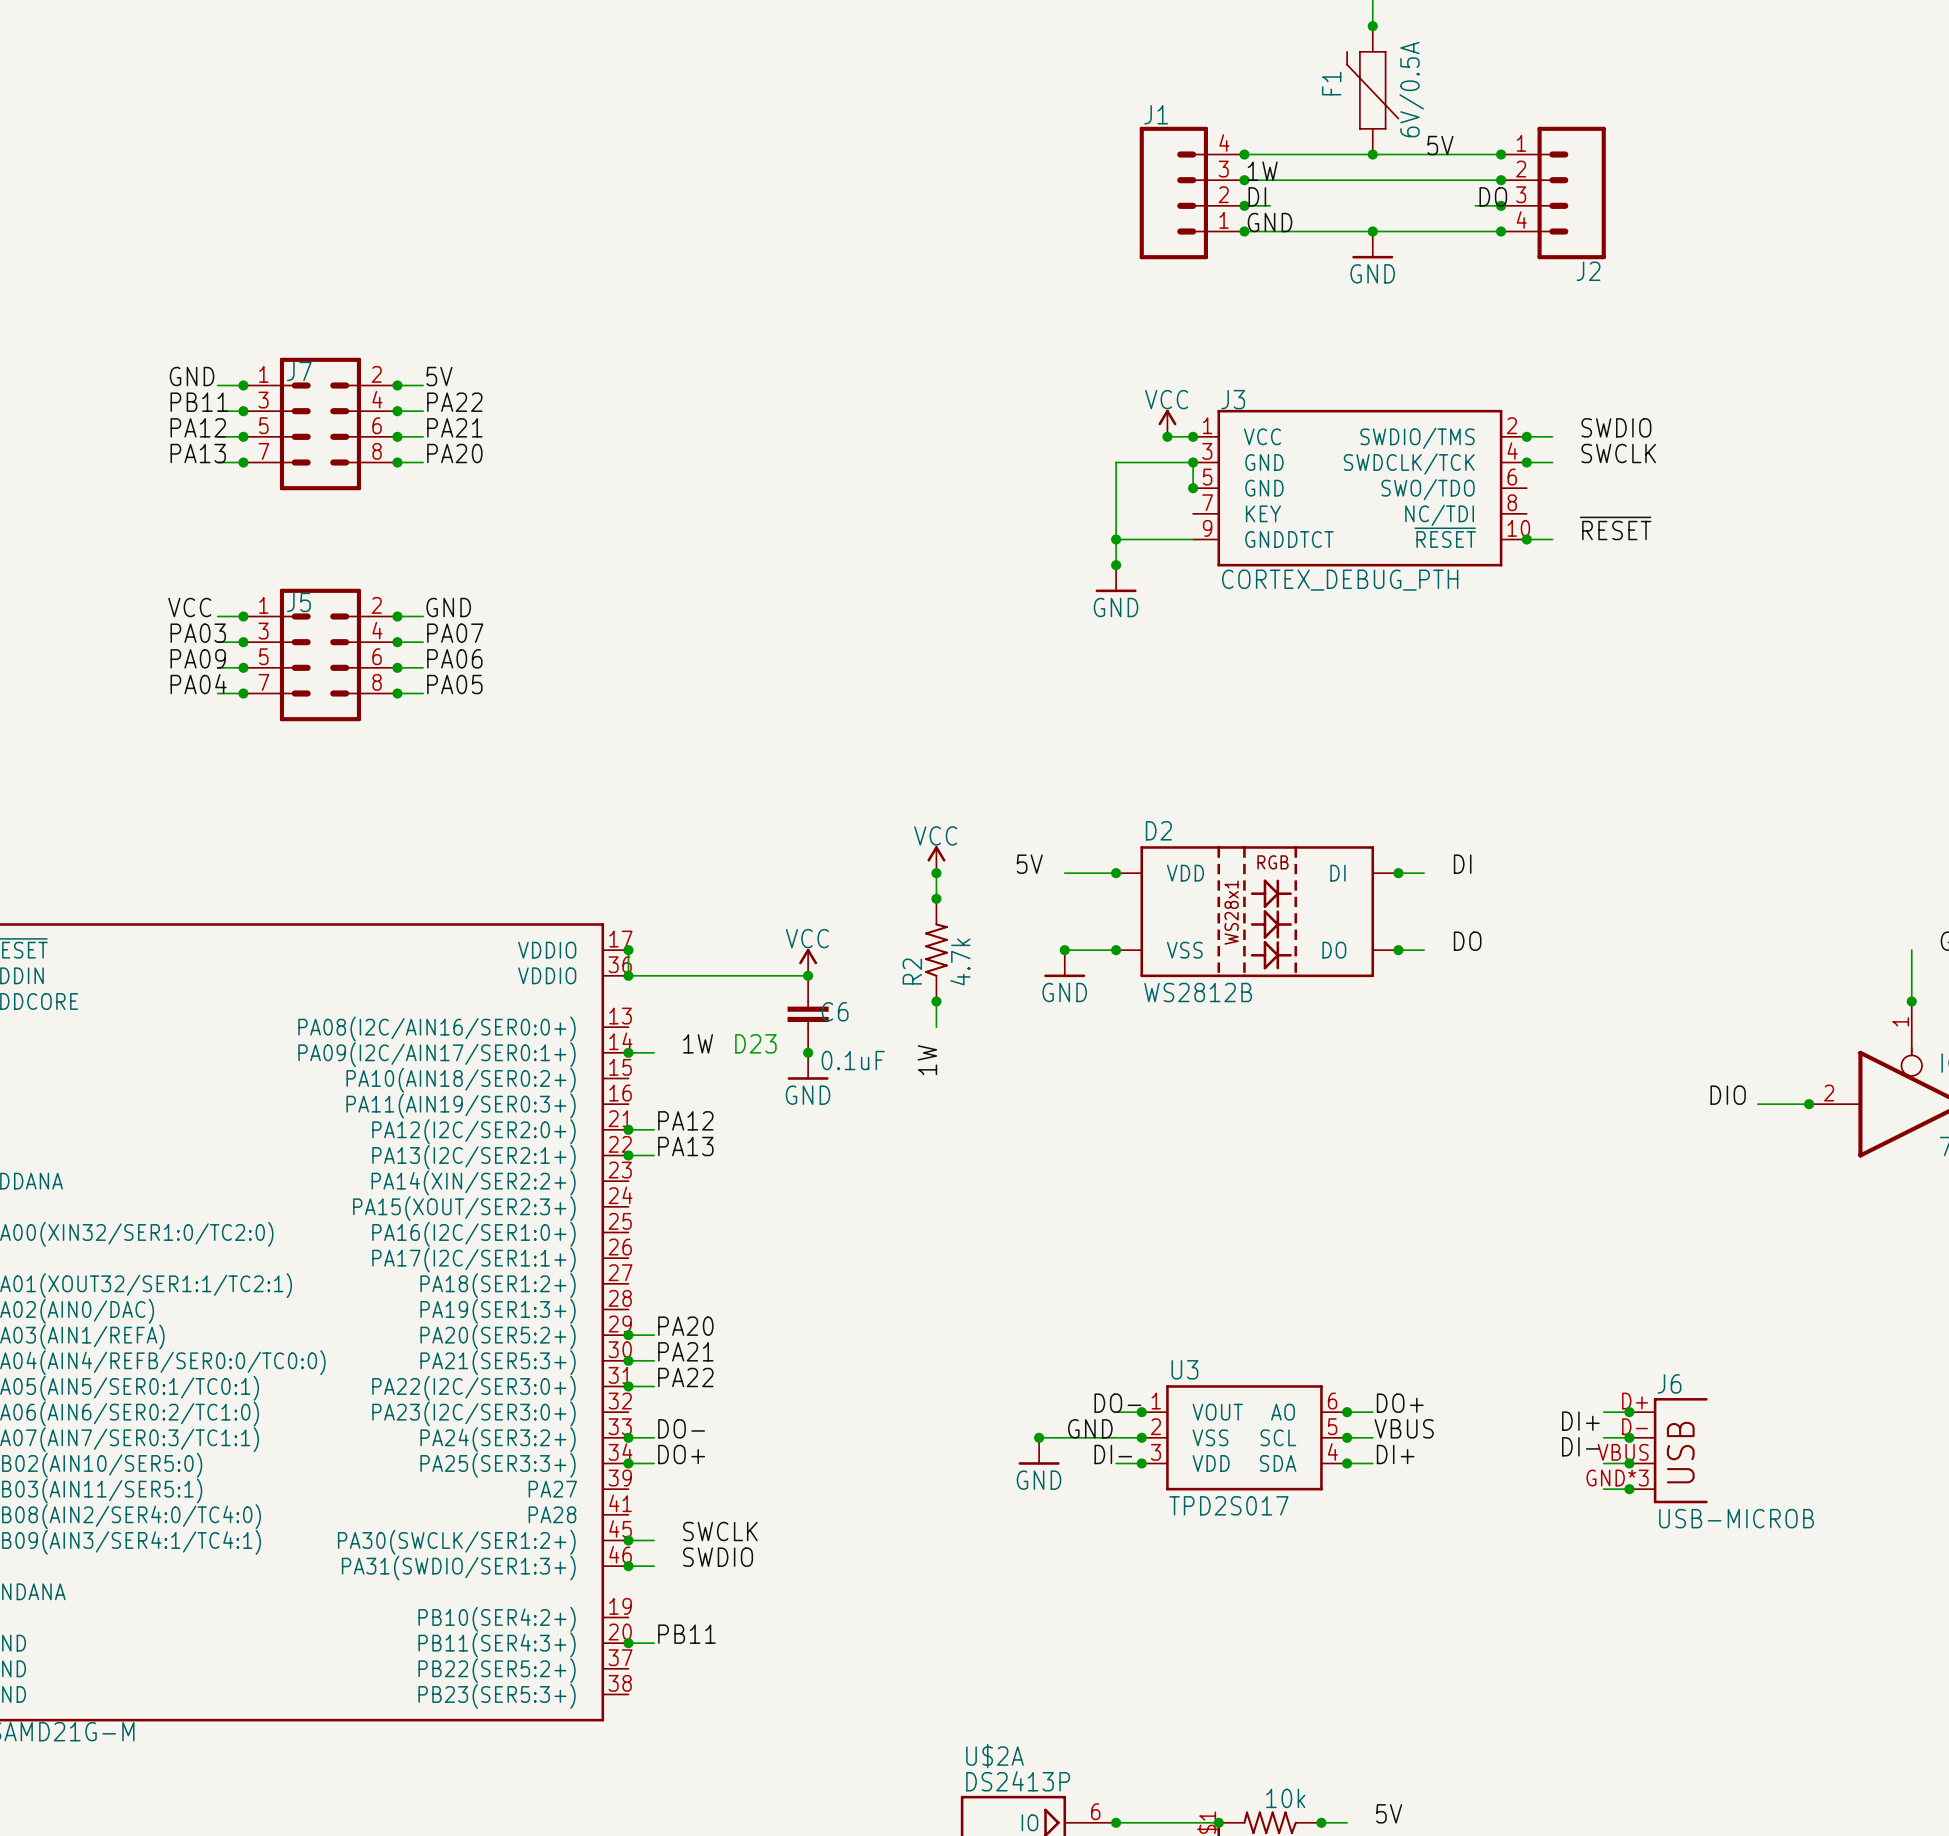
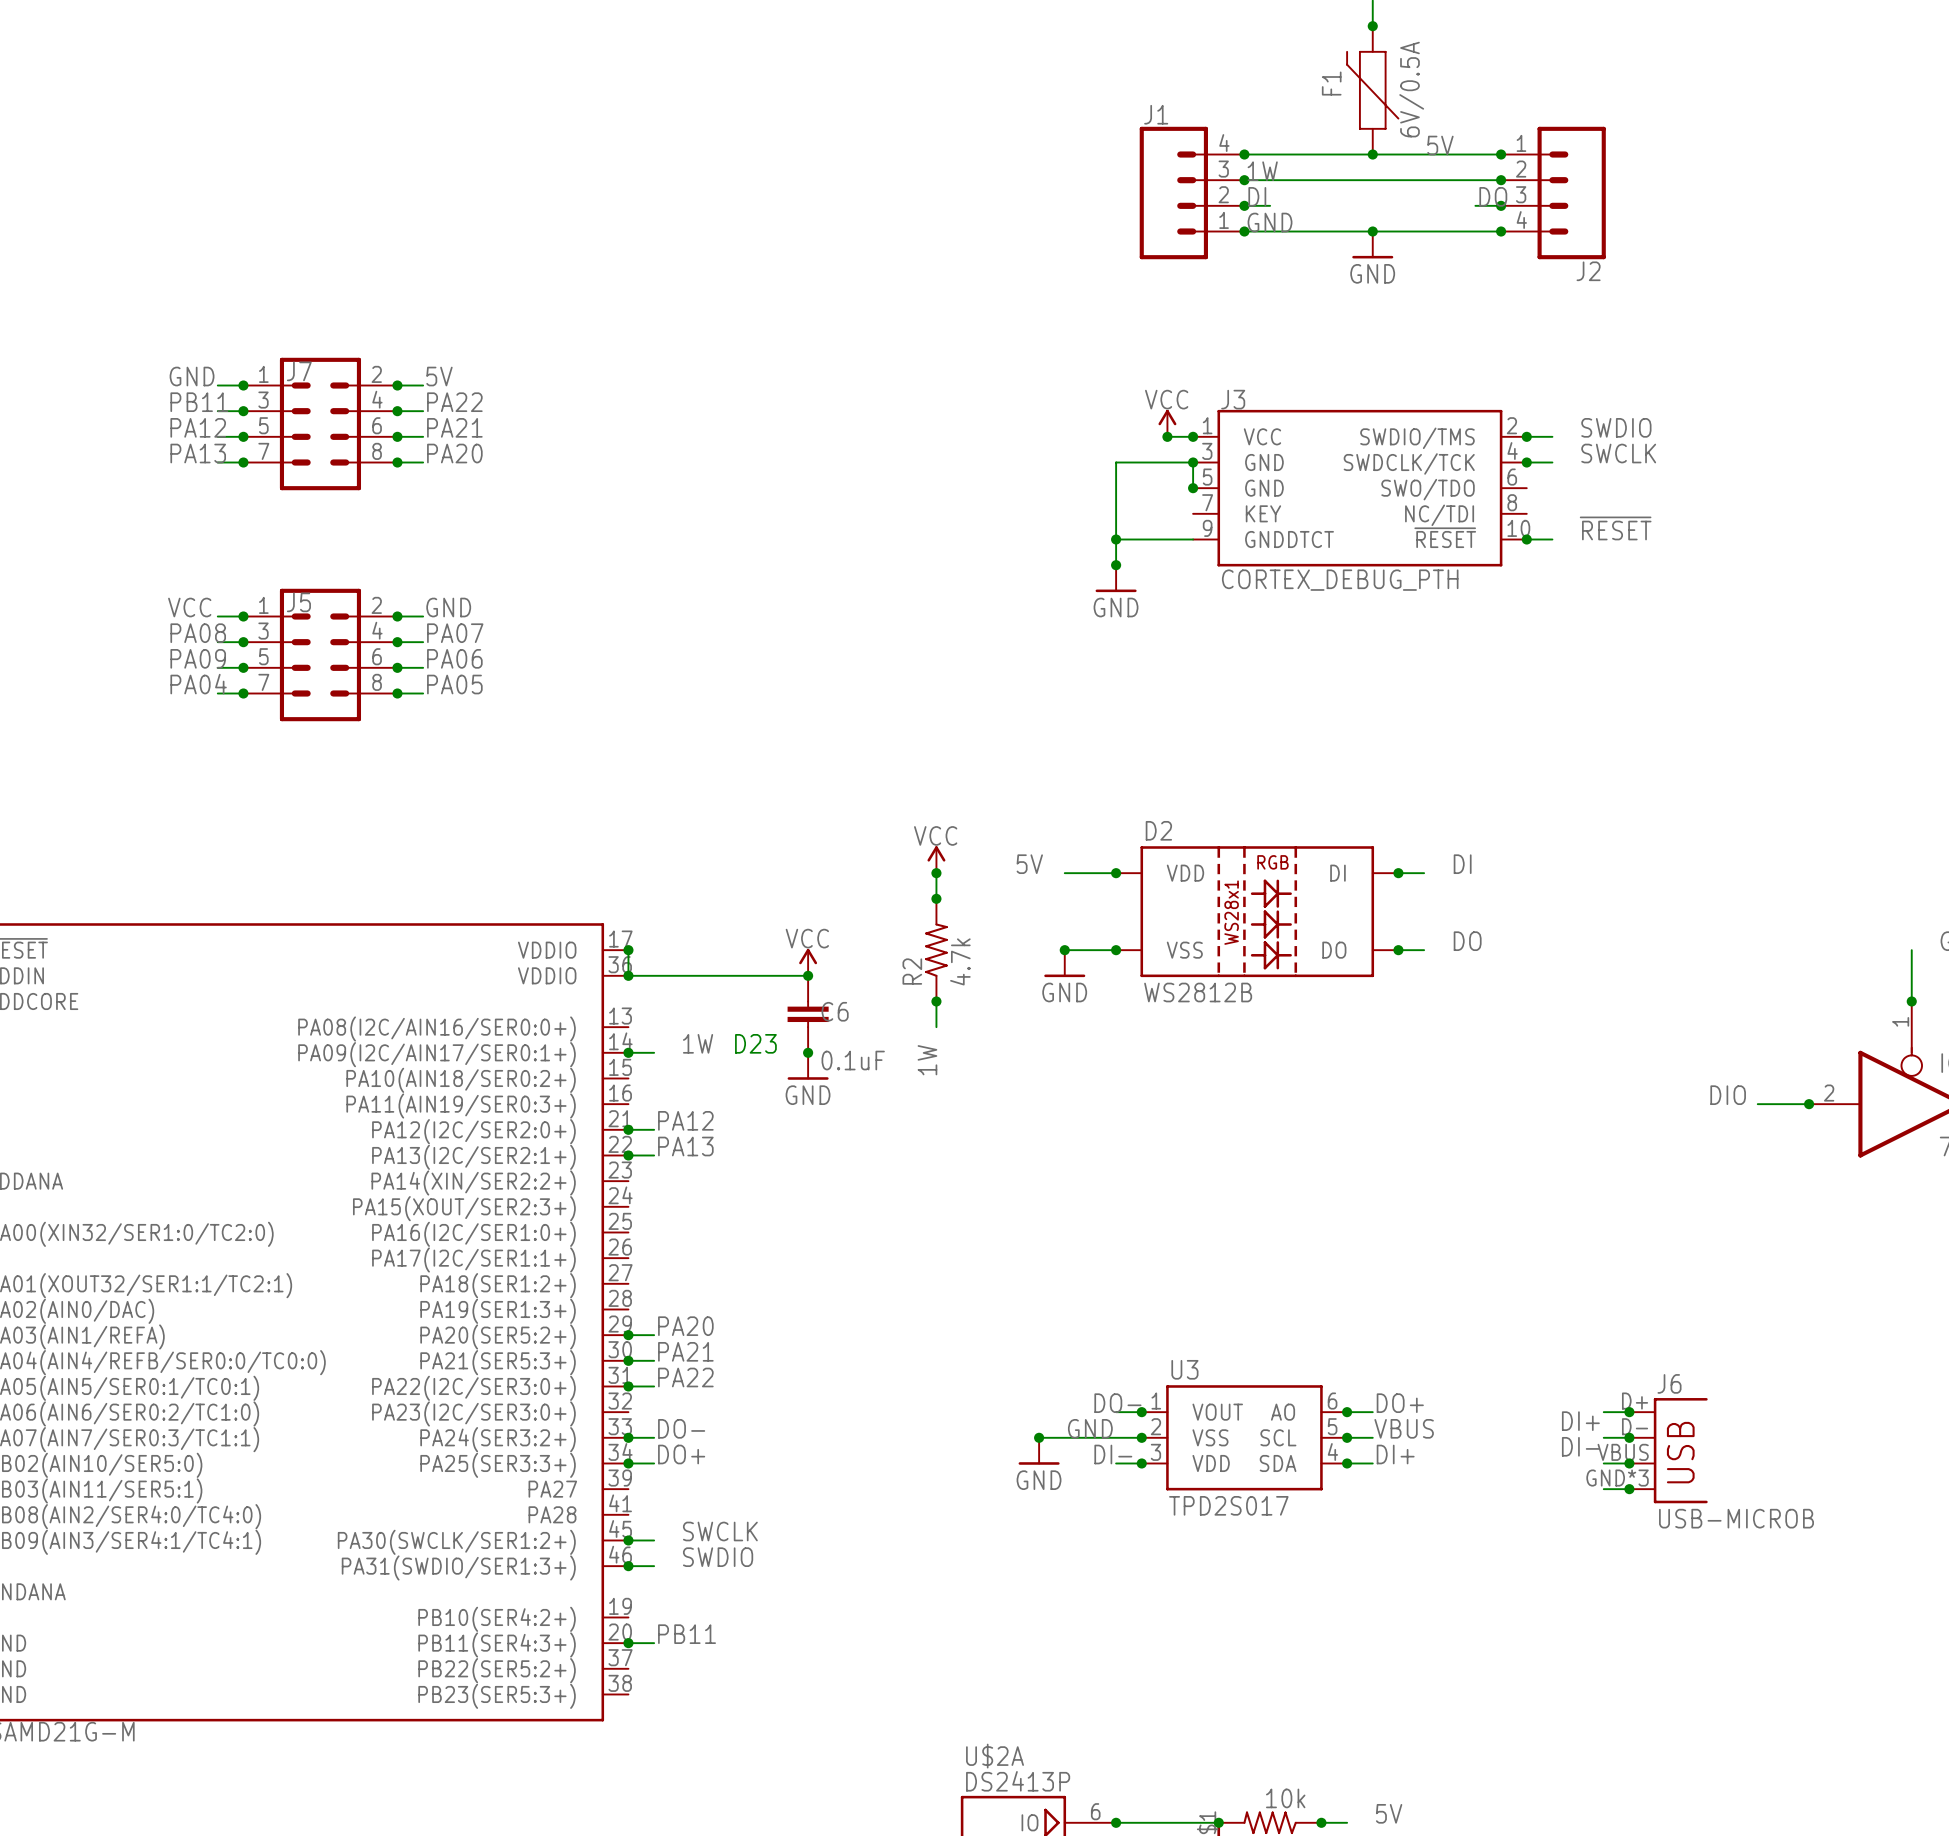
label: PA03 (198, 633) -> PA08 (198, 633)

